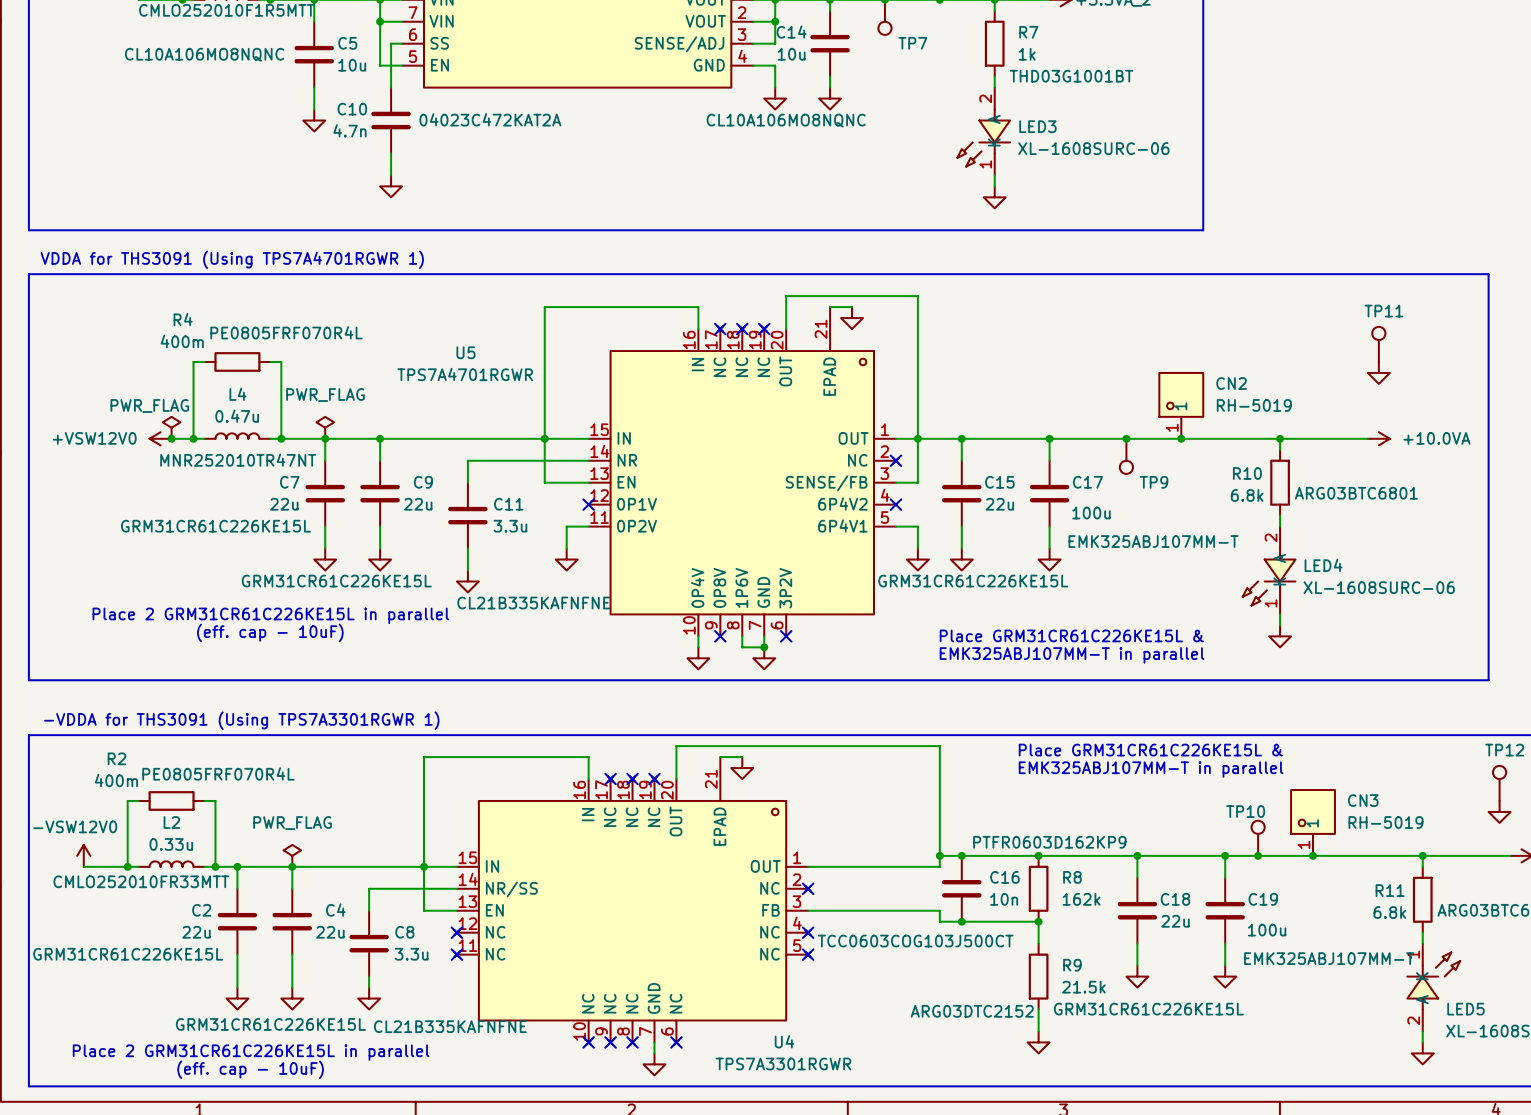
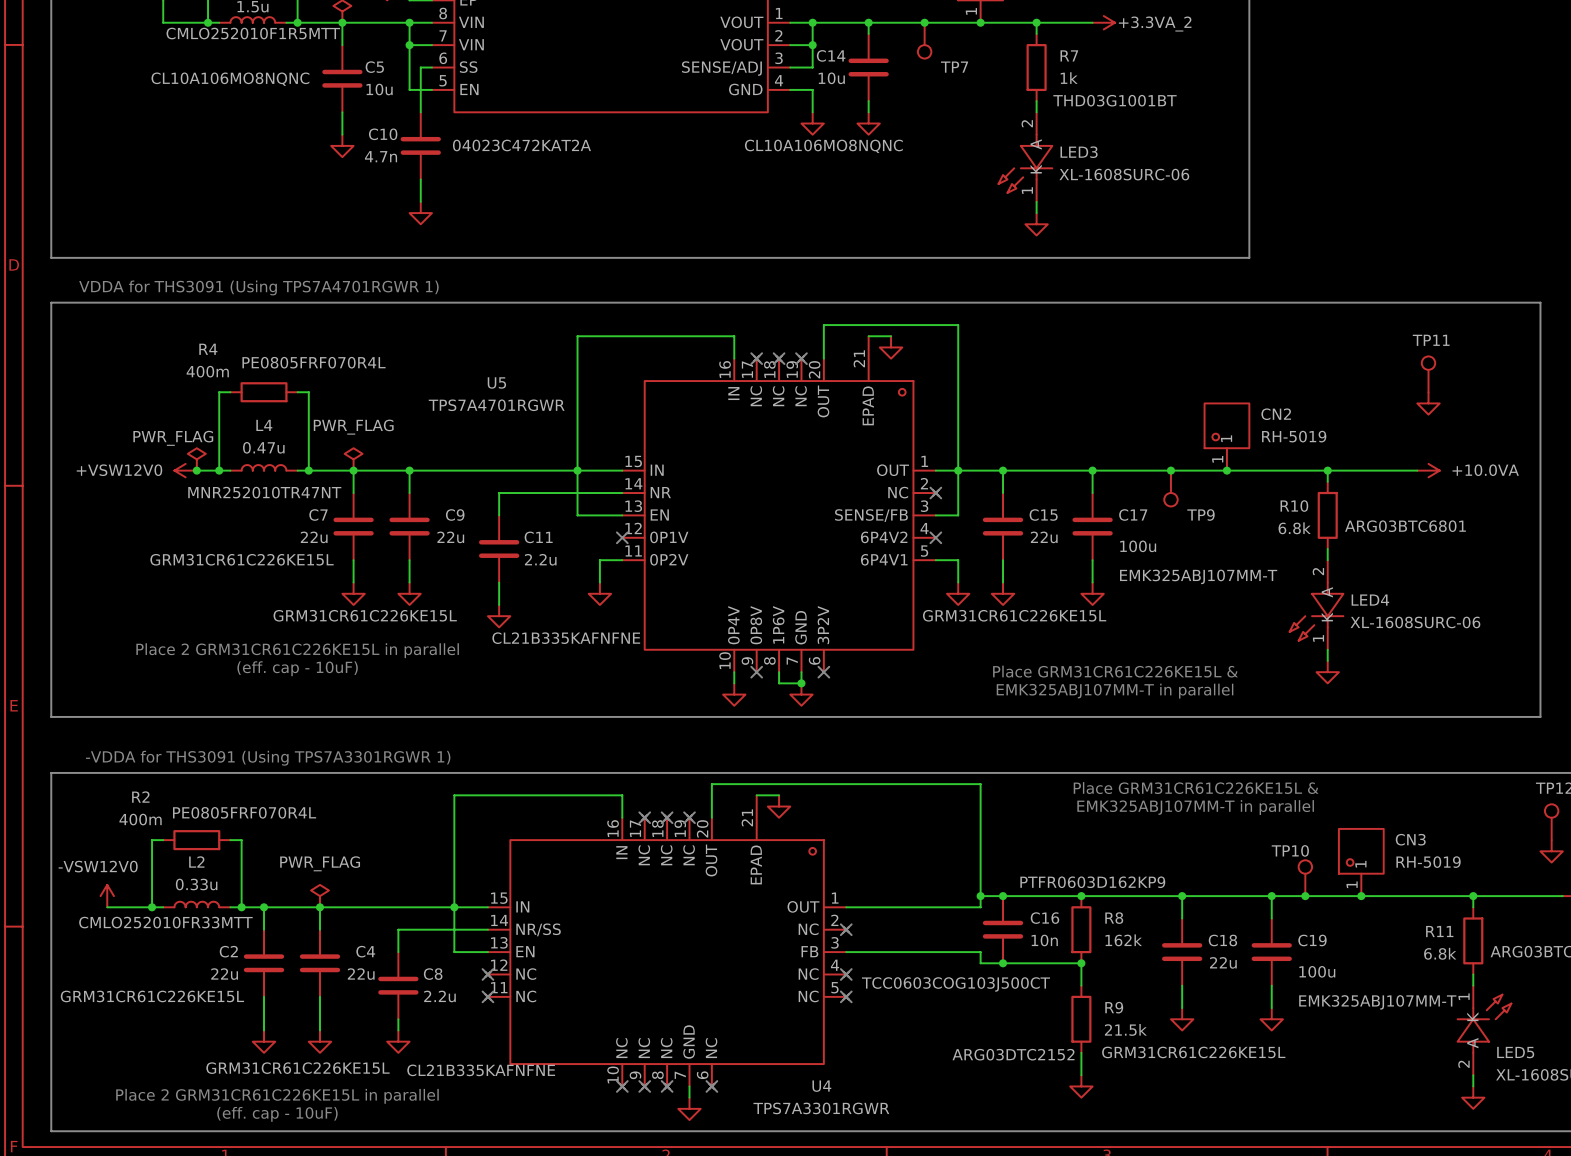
C11 value: 3.3u (510, 526) -> 2.2u (540, 559)
C8 value: 3.3u (411, 954) -> 2.2u (439, 996)

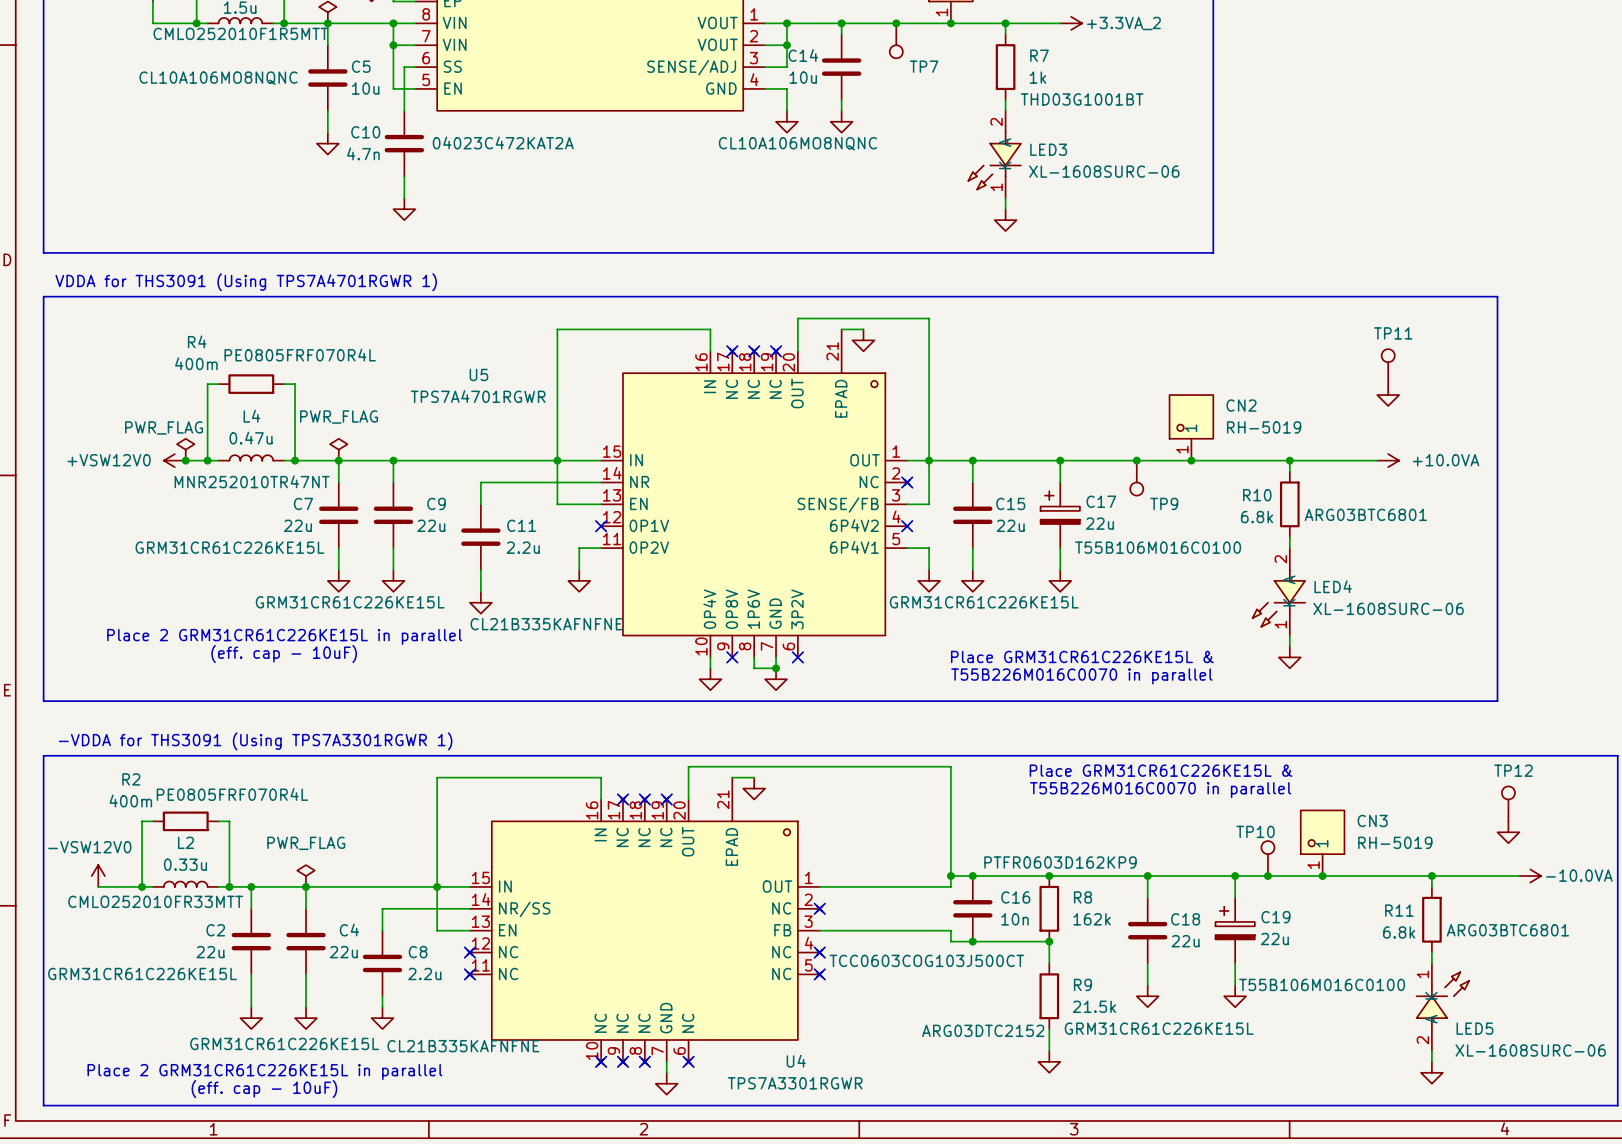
C17 symbol: [1072, 493, 1113, 561] -> [1040, 482, 1080, 549]
C17 value: 100u (1138, 546) -> 22u (1099, 523)
C17 text: EMK325ABJ107MM-T (1198, 576) -> T55B106M016C0100 (1158, 547)
text: EMK325ABJ107MM-T in parallel (1115, 691) -> T55B226M016C0070 in parallel (1081, 676)
text: EMK325ABJ107MM-T in parallel (1195, 807) -> T55B226M016C0070 in parallel (1160, 790)
C19 symbol: [1251, 918, 1292, 986] -> [1215, 897, 1255, 964]
C19 value: 100u (1317, 971) -> 22u (1274, 939)
C19 text: EMK325ABJ107MM-T (1377, 1002) -> T55B106M016C0100 (1322, 984)

